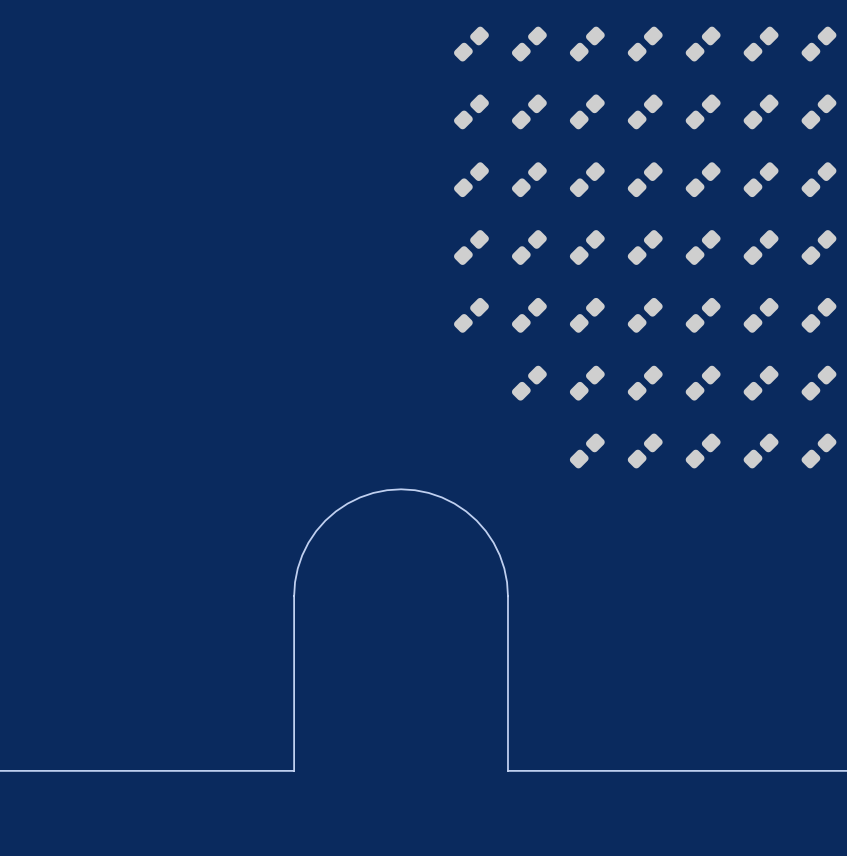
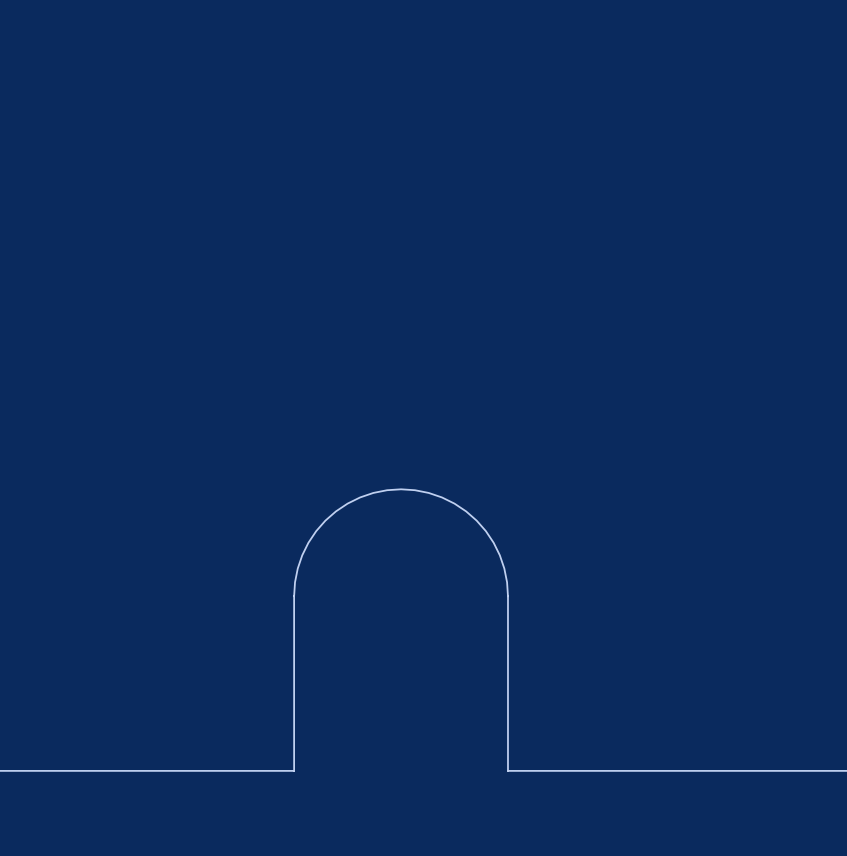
part: (471, 44) -> none
part: (529, 44) -> none
part: (587, 44) -> none
part: (645, 44) -> none
part: (703, 44) -> none
part: (761, 44) -> none
part: (818, 44) -> none
part: (471, 111) -> none
part: (529, 111) -> none
part: (587, 111) -> none
part: (645, 111) -> none
part: (703, 111) -> none
part: (761, 111) -> none
part: (818, 111) -> none
part: (471, 179) -> none
part: (529, 179) -> none
part: (587, 179) -> none
part: (645, 179) -> none
part: (703, 179) -> none
part: (761, 179) -> none
part: (818, 179) -> none
part: (471, 247) -> none
part: (529, 247) -> none
part: (587, 247) -> none
part: (645, 247) -> none
part: (703, 247) -> none
part: (761, 247) -> none
part: (818, 247) -> none
part: (471, 315) -> none
part: (529, 315) -> none
part: (587, 315) -> none
part: (645, 315) -> none
part: (703, 315) -> none
part: (761, 315) -> none
part: (818, 315) -> none
part: (529, 383) -> none
part: (587, 383) -> none
part: (645, 383) -> none
part: (703, 383) -> none
part: (761, 383) -> none
part: (818, 383) -> none
part: (587, 450) -> none
part: (645, 450) -> none
part: (703, 450) -> none
part: (761, 450) -> none
part: (818, 450) -> none

